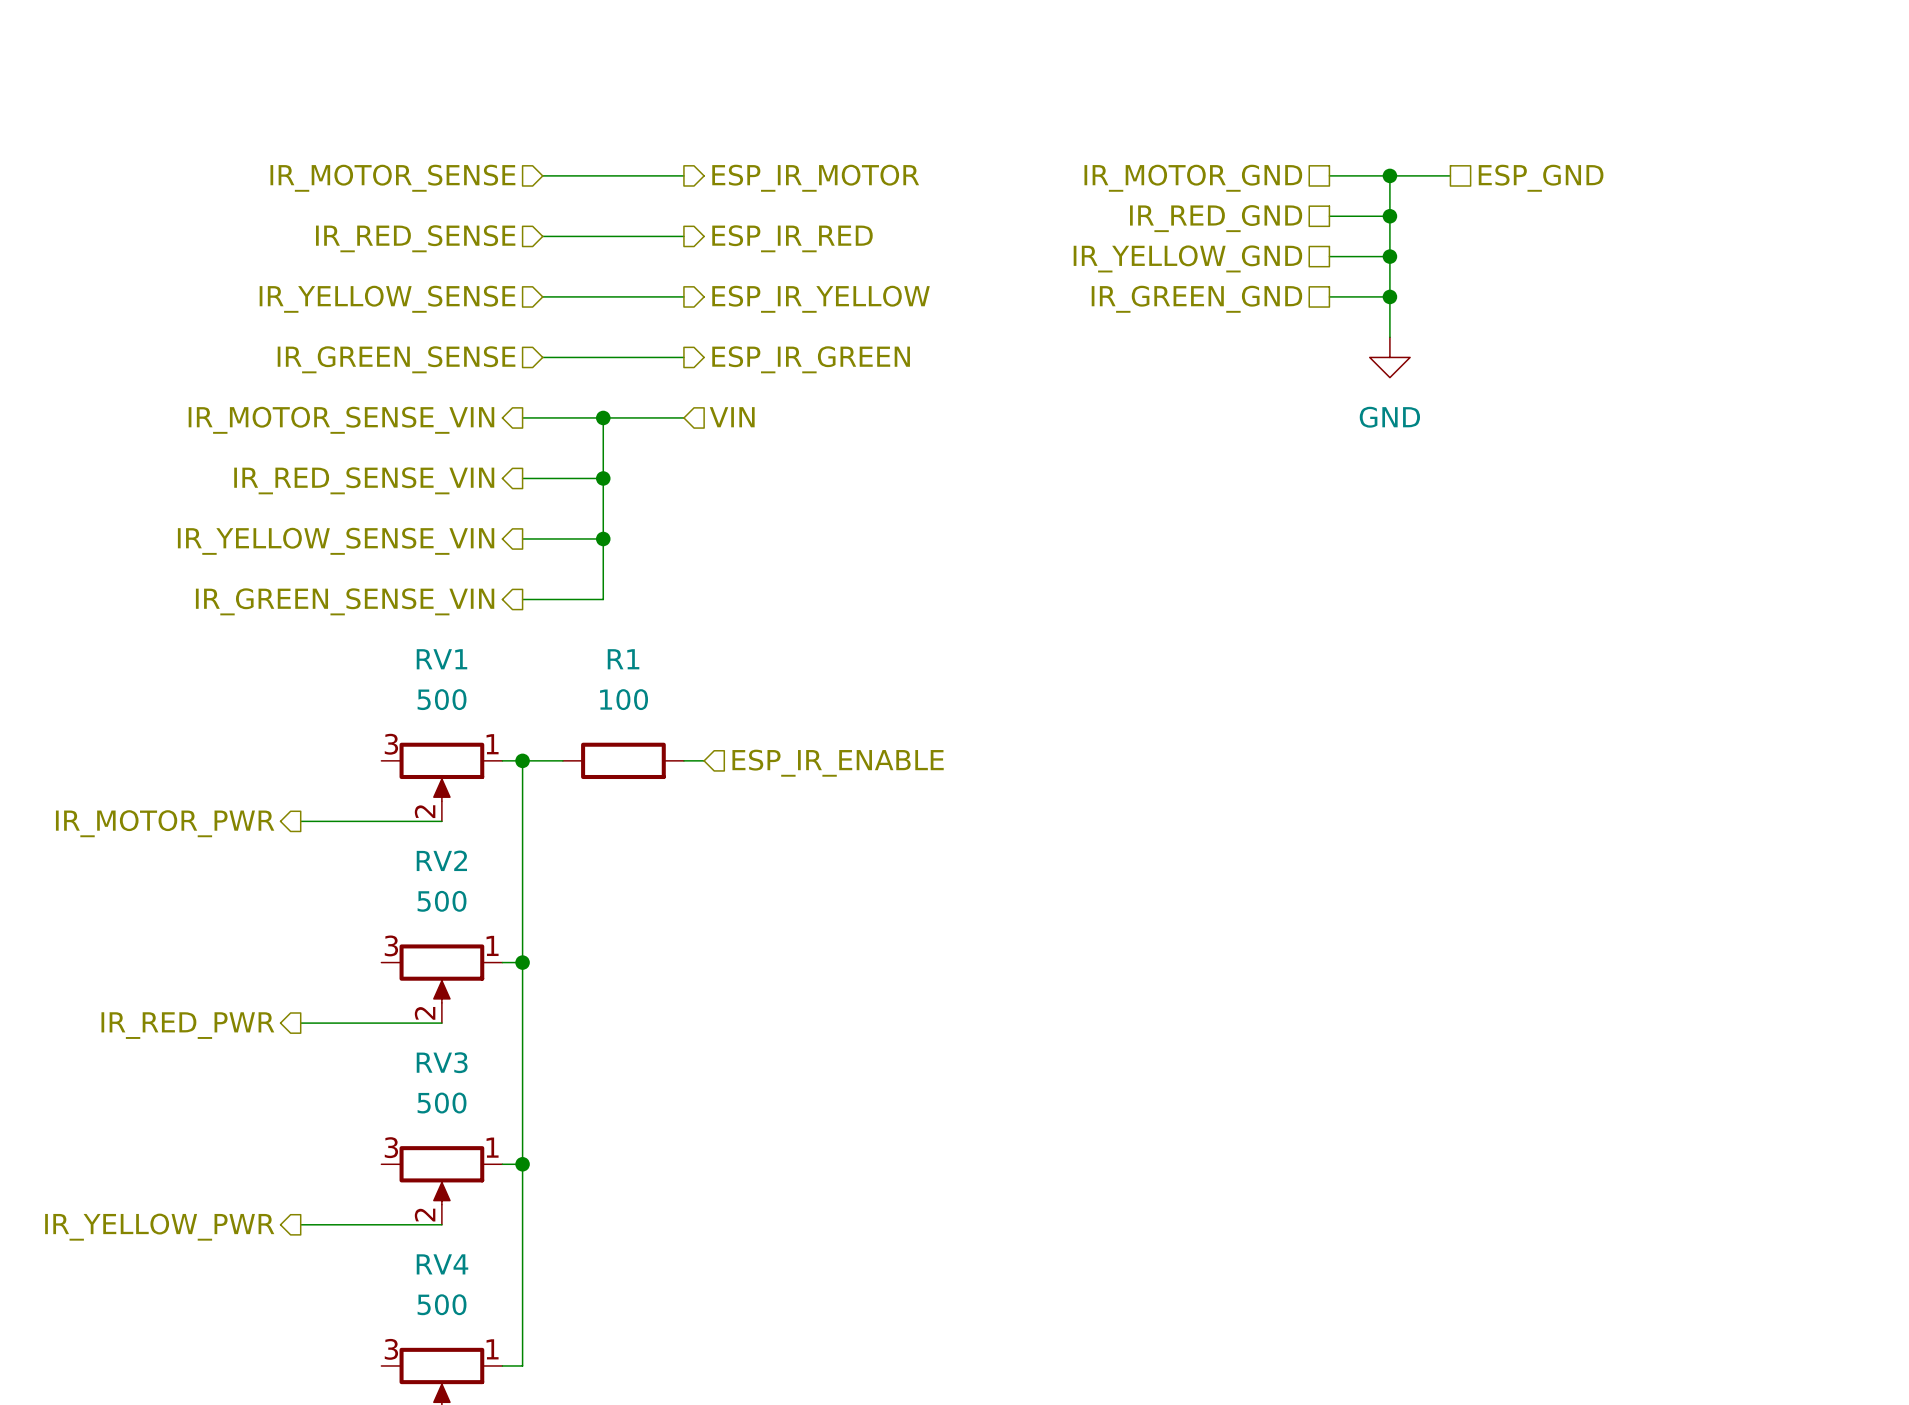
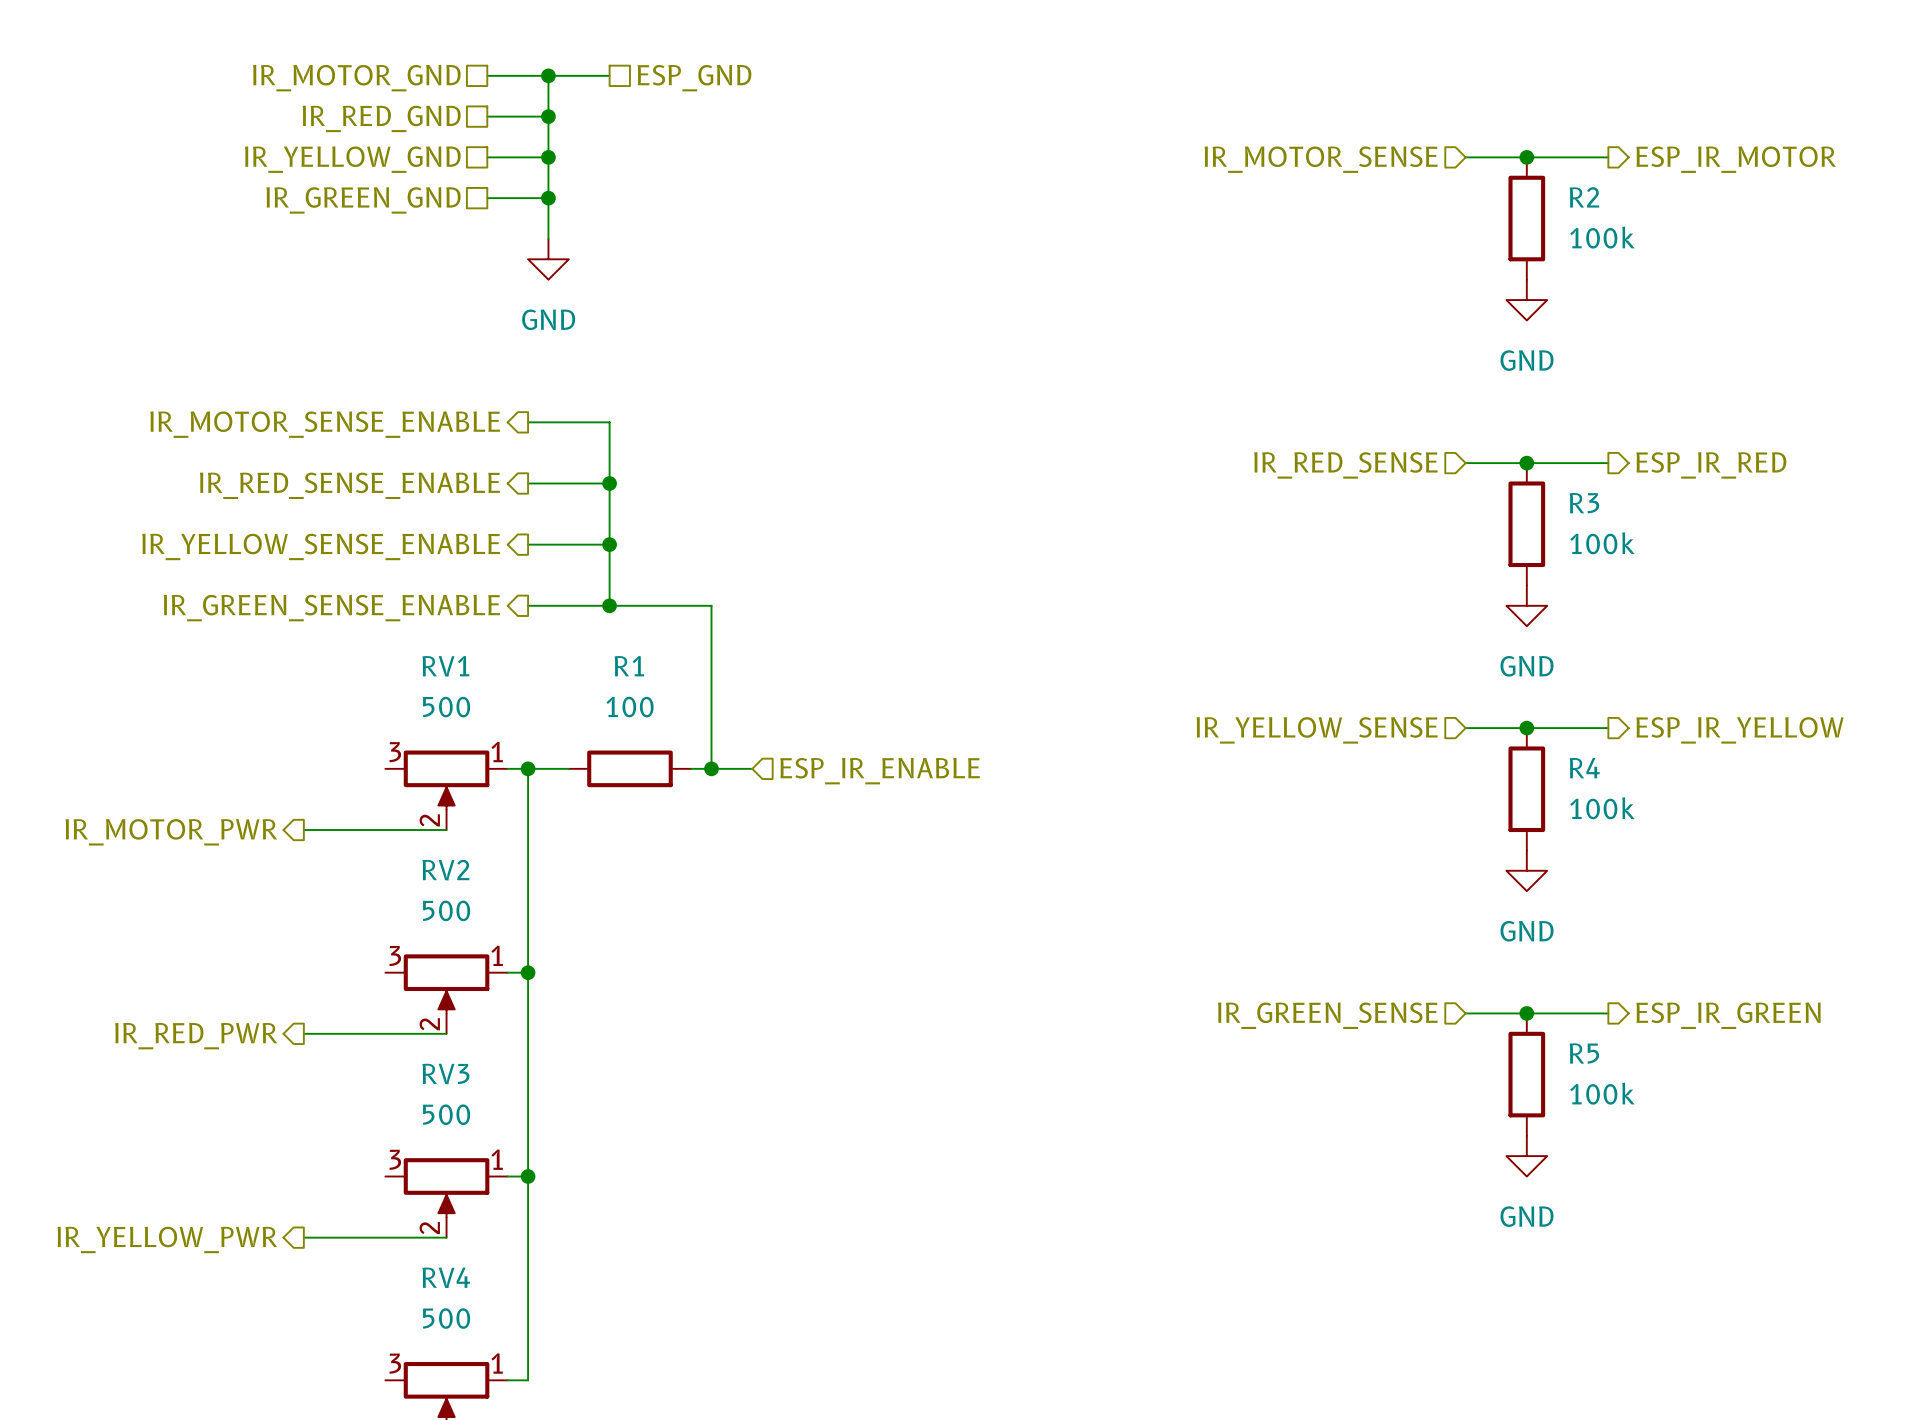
wire: none -> (487, 75) (609, 75)
junction: none -> (548, 75)
hierarchical label: none -> IR_MOTOR_GND (356, 78)
hierarchical label: none -> ESP_GND (694, 78)
wire: none -> (487, 116) (548, 116)
junction: none -> (548, 116)
hierarchical label: none -> IR_RED_GND (381, 118)
wire: none -> (487, 157) (548, 157)
junction: none -> (548, 157)
wire: none -> (1465, 157) (1608, 157)
junction: none -> (1526, 157)
hierarchical label: none -> IR_YELLOW_GND (352, 159)
hierarchical label: none -> ESP_IR_MOTOR (1736, 159)
wire: (542, 175) (683, 175) -> none
wire: (1329, 175) (1450, 175) -> none
wire: (1389, 175) (1389, 337) -> none
junction: (1389, 175) -> none
hierarchical label: IR_MOTOR_SENSE (392, 178) -> none
hierarchical label: ESP_IR_MOTOR (815, 178) -> none
hierarchical label shape: passive (1193, 178) -> input (1321, 159)
hierarchical label: IR_MOTOR_GND (1193, 178) -> IR_MOTOR_SENSE (1321, 159)
hierarchical label: ESP_GND (1541, 178) -> none
wire: none -> (487, 198) (548, 198)
junction: none -> (548, 198)
hierarchical label: none -> IR_GREEN_GND (363, 200)
wire: (1329, 216) (1389, 216) -> none
junction: (1389, 216) -> none
R2: none -> 100k (1526, 218)
hierarchical label: IR_RED_GND (1216, 218) -> none
wire: (542, 236) (683, 236) -> (548, 238) (548, 75)
hierarchical label: IR_RED_SENSE (415, 238) -> none
hierarchical label: ESP_IR_RED (792, 238) -> none
power symbol: none -> GND (548, 259)
wire: (1329, 256) (1389, 256) -> none
junction: (1389, 256) -> none
hierarchical label: IR_YELLOW_GND (1187, 258) -> none
wire: (542, 296) (683, 296) -> none
wire: (1329, 296) (1389, 296) -> none
junction: (1389, 296) -> none
power symbol: none -> GND (1526, 300)
hierarchical label: IR_YELLOW_SENSE (387, 299) -> none
hierarchical label: ESP_IR_YELLOW (821, 299) -> none
hierarchical label: IR_GREEN_GND (1196, 299) -> none
wire: (542, 357) (683, 357) -> none
power symbol: GND (1389, 357) -> none
hierarchical label: IR_GREEN_SENSE (396, 359) -> none
hierarchical label: ESP_IR_GREEN (811, 359) -> none
wire: (603, 417) (683, 417) -> none
junction: (603, 417) -> none
hierarchical label: VIN (732, 417) -> none
hierarchical label: IR_MOTOR_SENSE_VIN (341, 420) -> IR_MOTOR_SENSE_ENABLE (325, 424)
wire: none -> (1465, 463) (1608, 463)
junction: none -> (1526, 463)
hierarchical label: none -> IR_RED_SENSE (1345, 465)
hierarchical label: none -> ESP_IR_RED (1711, 465)
hierarchical label: IR_RED_SENSE_VIN (364, 480) -> IR_RED_SENSE_ENABLE (350, 485)
R3: none -> 100k (1526, 524)
hierarchical label: IR_YELLOW_SENSE_VIN (336, 541) -> IR_YELLOW_SENSE_ENABLE (321, 546)
wire: none -> (609, 605) (711, 605) (711, 768) (752, 768)
junction: none -> (609, 605)
power symbol: none -> GND (1526, 605)
hierarchical label: IR_GREEN_SENSE_VIN (345, 601) -> IR_GREEN_SENSE_ENABLE (331, 608)
wire: none -> (1465, 728) (1608, 728)
junction: none -> (1526, 728)
hierarchical label: none -> IR_YELLOW_SENSE (1317, 730)
hierarchical label: none -> ESP_IR_YELLOW (1739, 730)
junction: none -> (711, 768)
hierarchical label position: ESP_IR_ENABLE (838, 763) -> ESP_IR_ENABLE (880, 771)
R4: none -> 100k (1526, 789)
power symbol: none -> GND (1526, 870)
wire: none -> (1465, 1013) (1608, 1013)
junction: none -> (1526, 1013)
hierarchical label: none -> IR_GREEN_SENSE (1327, 1015)
hierarchical label: none -> ESP_IR_GREEN (1728, 1015)
R5: none -> 100k (1526, 1074)
power symbol: none -> GND (1526, 1156)

